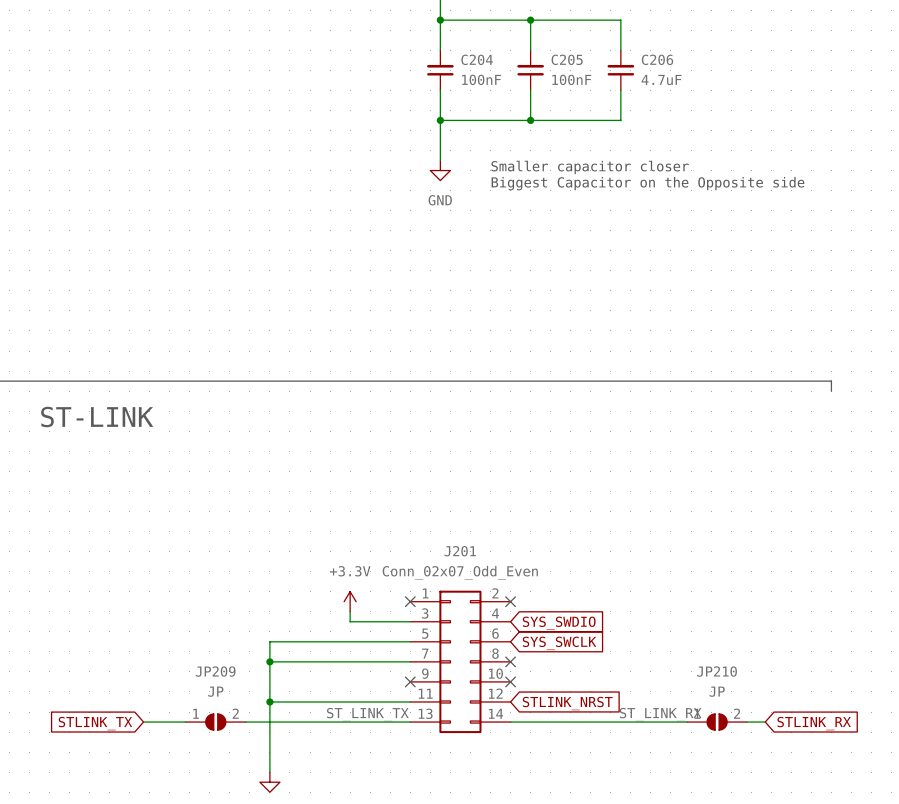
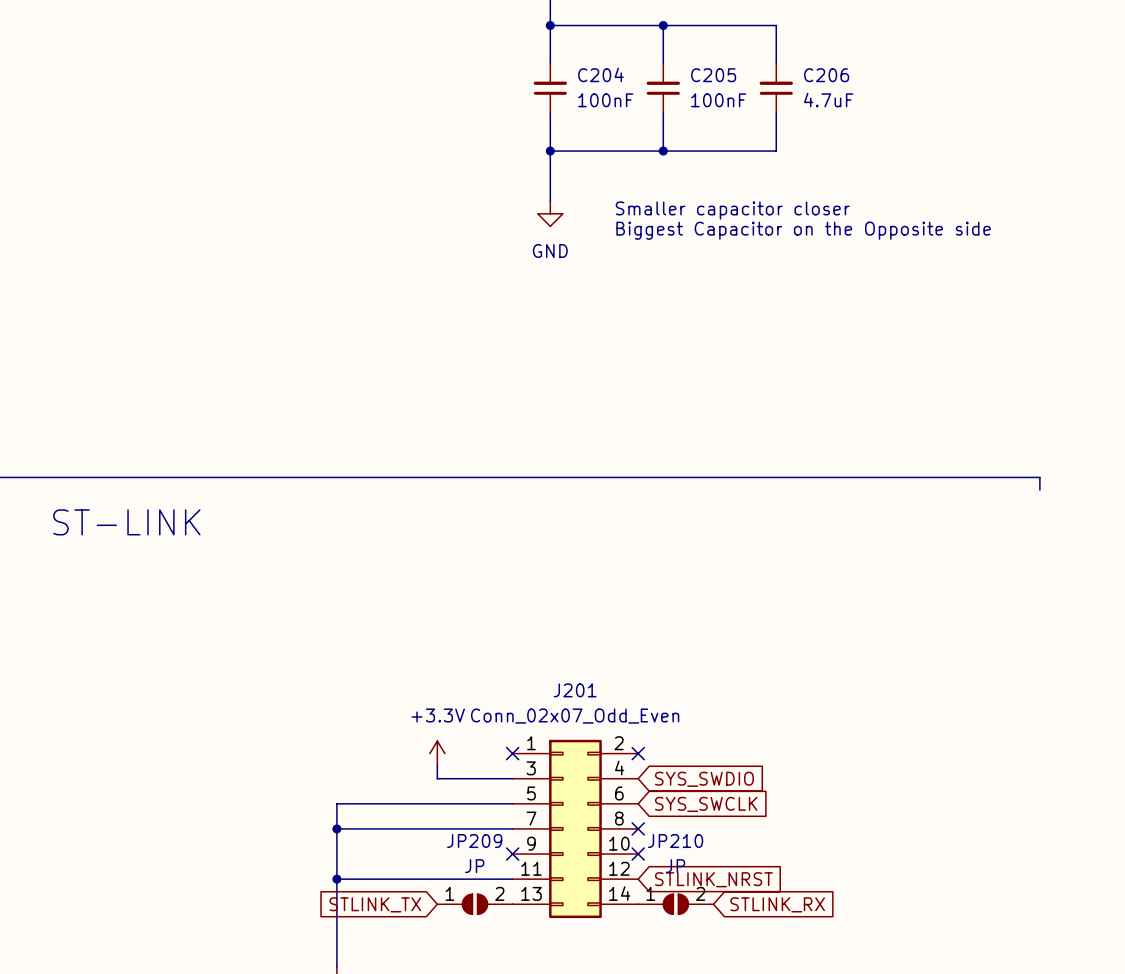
label: ST_LINK_TX (367, 714) -> none
label: ST_LINK_RX (660, 714) -> none
wire: (143, 722) (185, 722) -> none
JP209 position: (215, 722) -> (475, 904)
wire: (245, 722) (410, 722) -> none
wire: (510, 722) (687, 722) -> none
JP210 position: (717, 722) -> (675, 904)
wire: (747, 722) (765, 722) -> none
global label: STLINK_TX (95, 723) -> none
global label: none -> STLINK_TX (375, 904)
global label position: STLINK_RX (814, 723) -> STLINK_RX (777, 904)

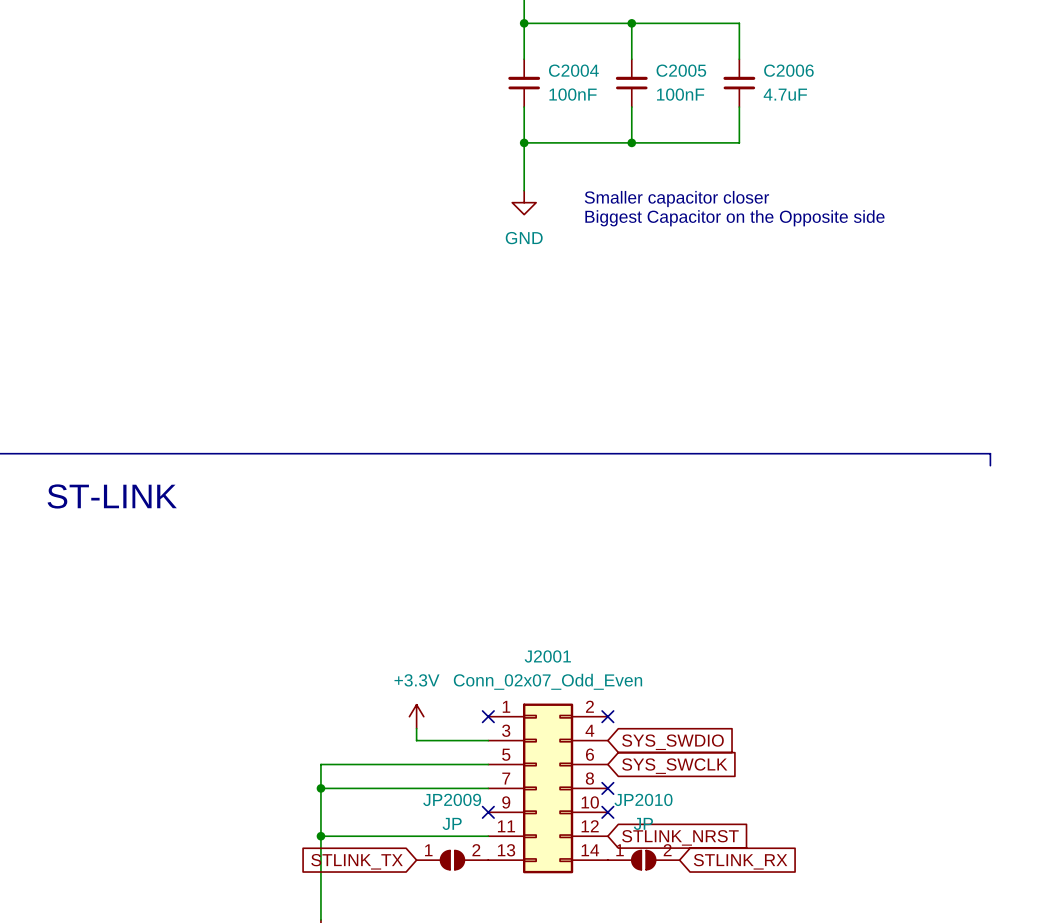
C204 name: C204 (600, 74) -> C2004 (573, 70)
C205 name: C205 (713, 75) -> C2005 (681, 70)
C206 name: C206 (826, 75) -> C2006 (788, 70)
J201 name: J201 (575, 690) -> J2001 (547, 656)
JP209 name: JP209 (474, 841) -> JP2009 (452, 799)
JP210 name: JP210 (675, 841) -> JP2010 (643, 799)

